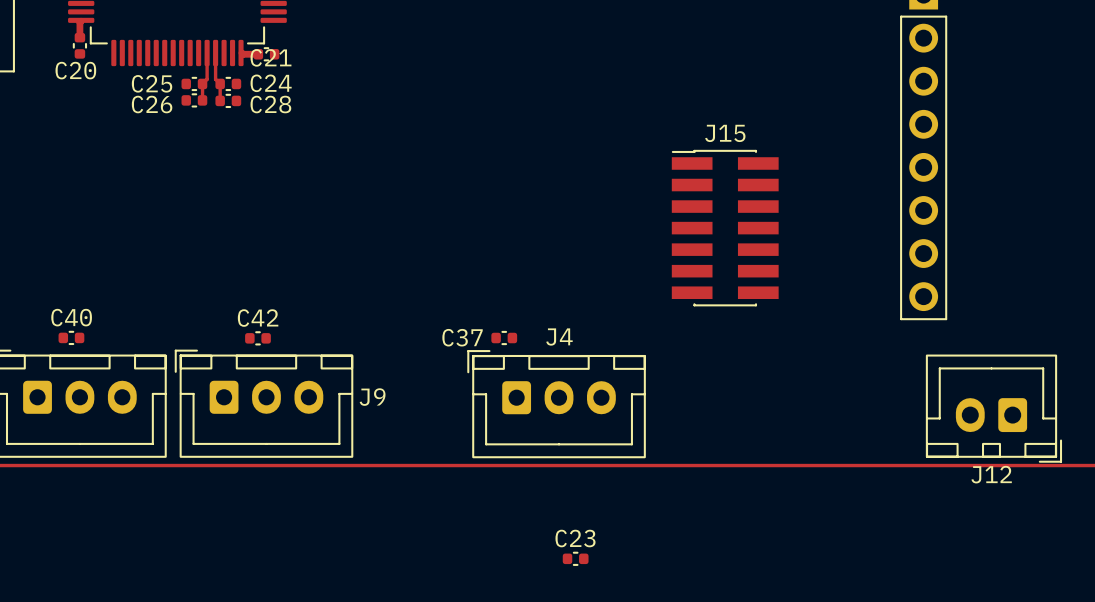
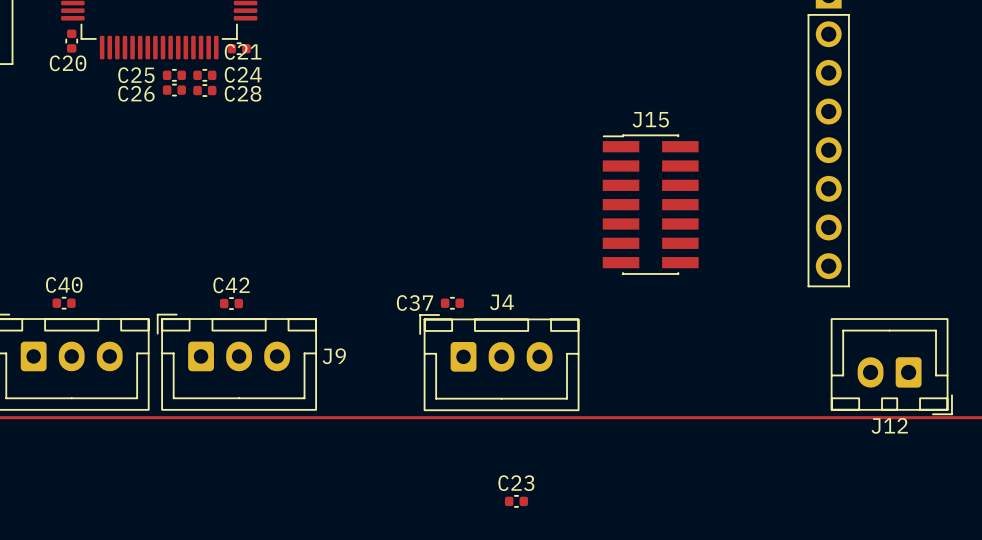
track: (81, 21) (79, 37) -> none
track: (207, 53) (207, 79) (202, 83) (202, 100) -> none
track: (215, 53) (215, 79) (220, 83) (220, 100) -> none
track: (241, 53) (258, 54) -> none

